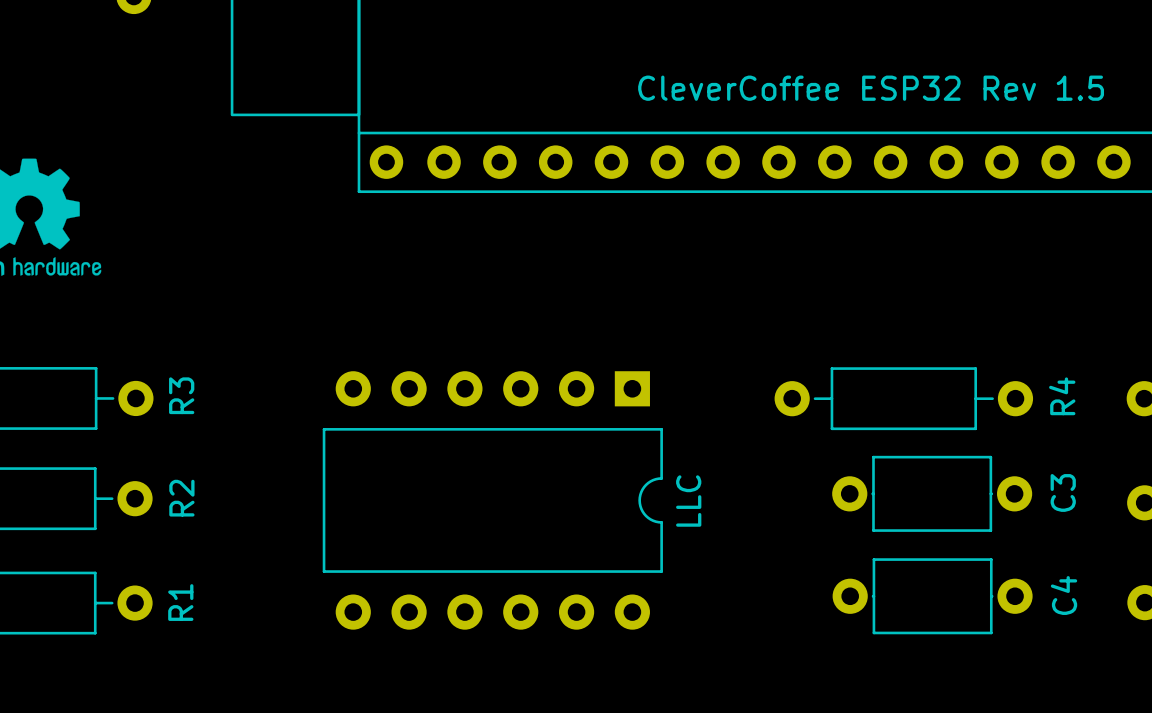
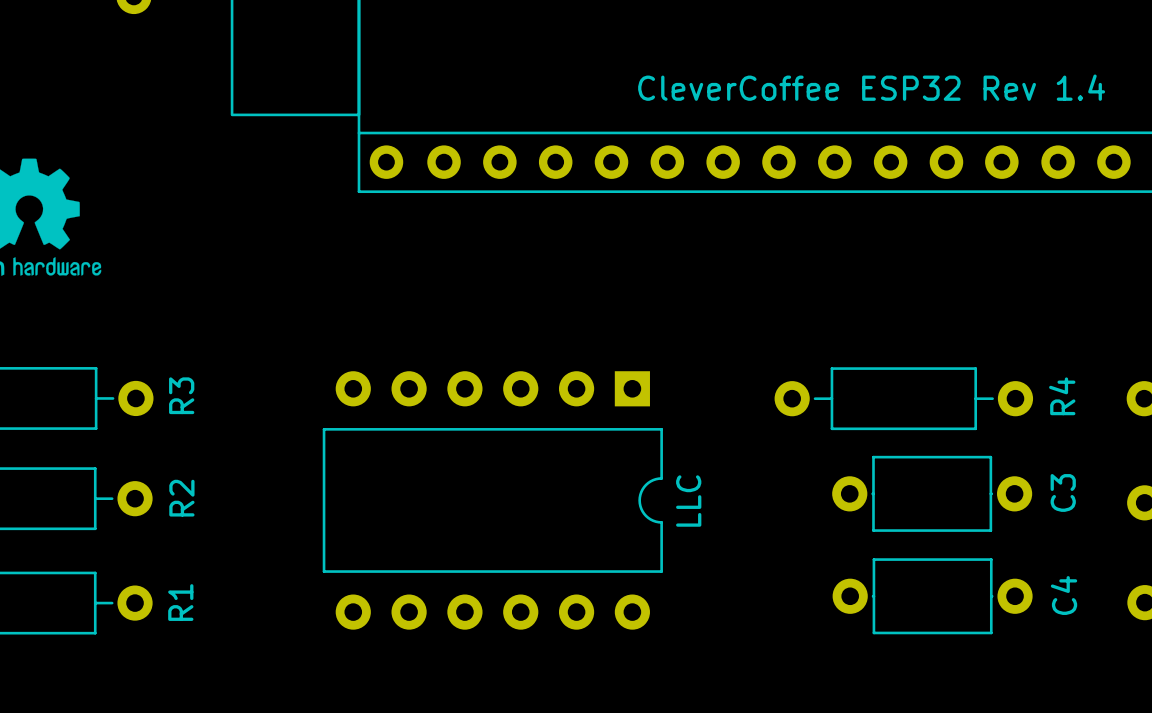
text: CleverCoffee ESP32 Rev 1.5 (871, 88) -> CleverCoffee ESP32 Rev 1.4 (871, 87)

